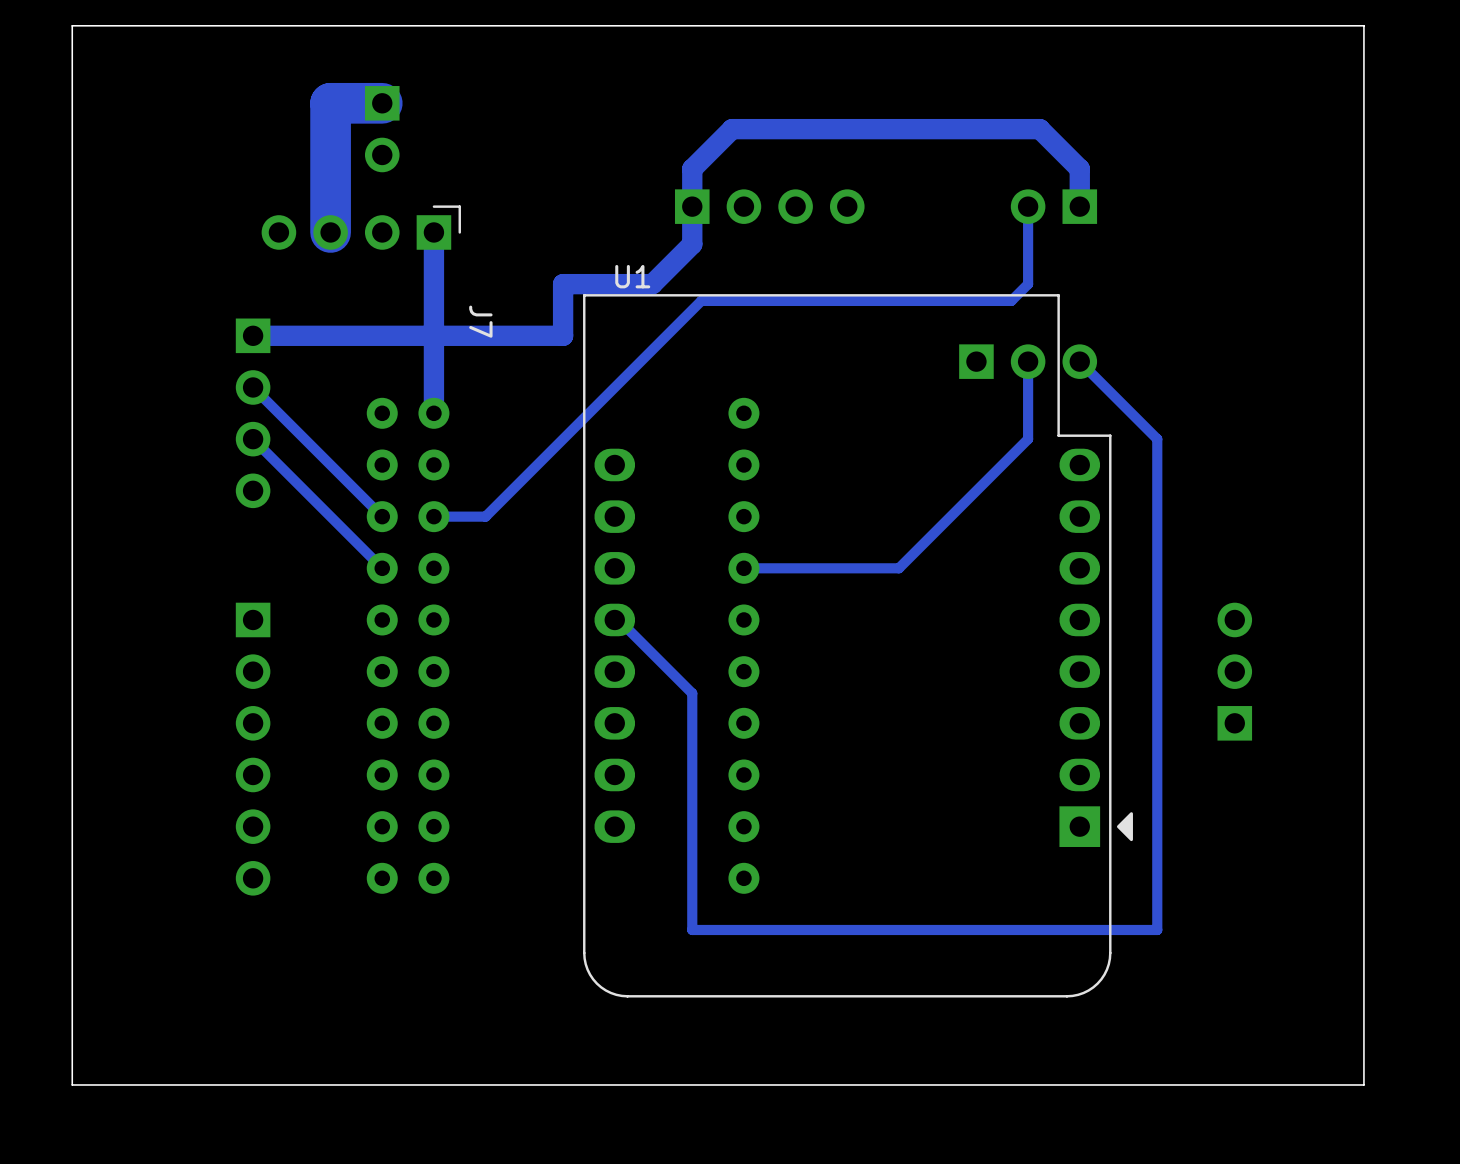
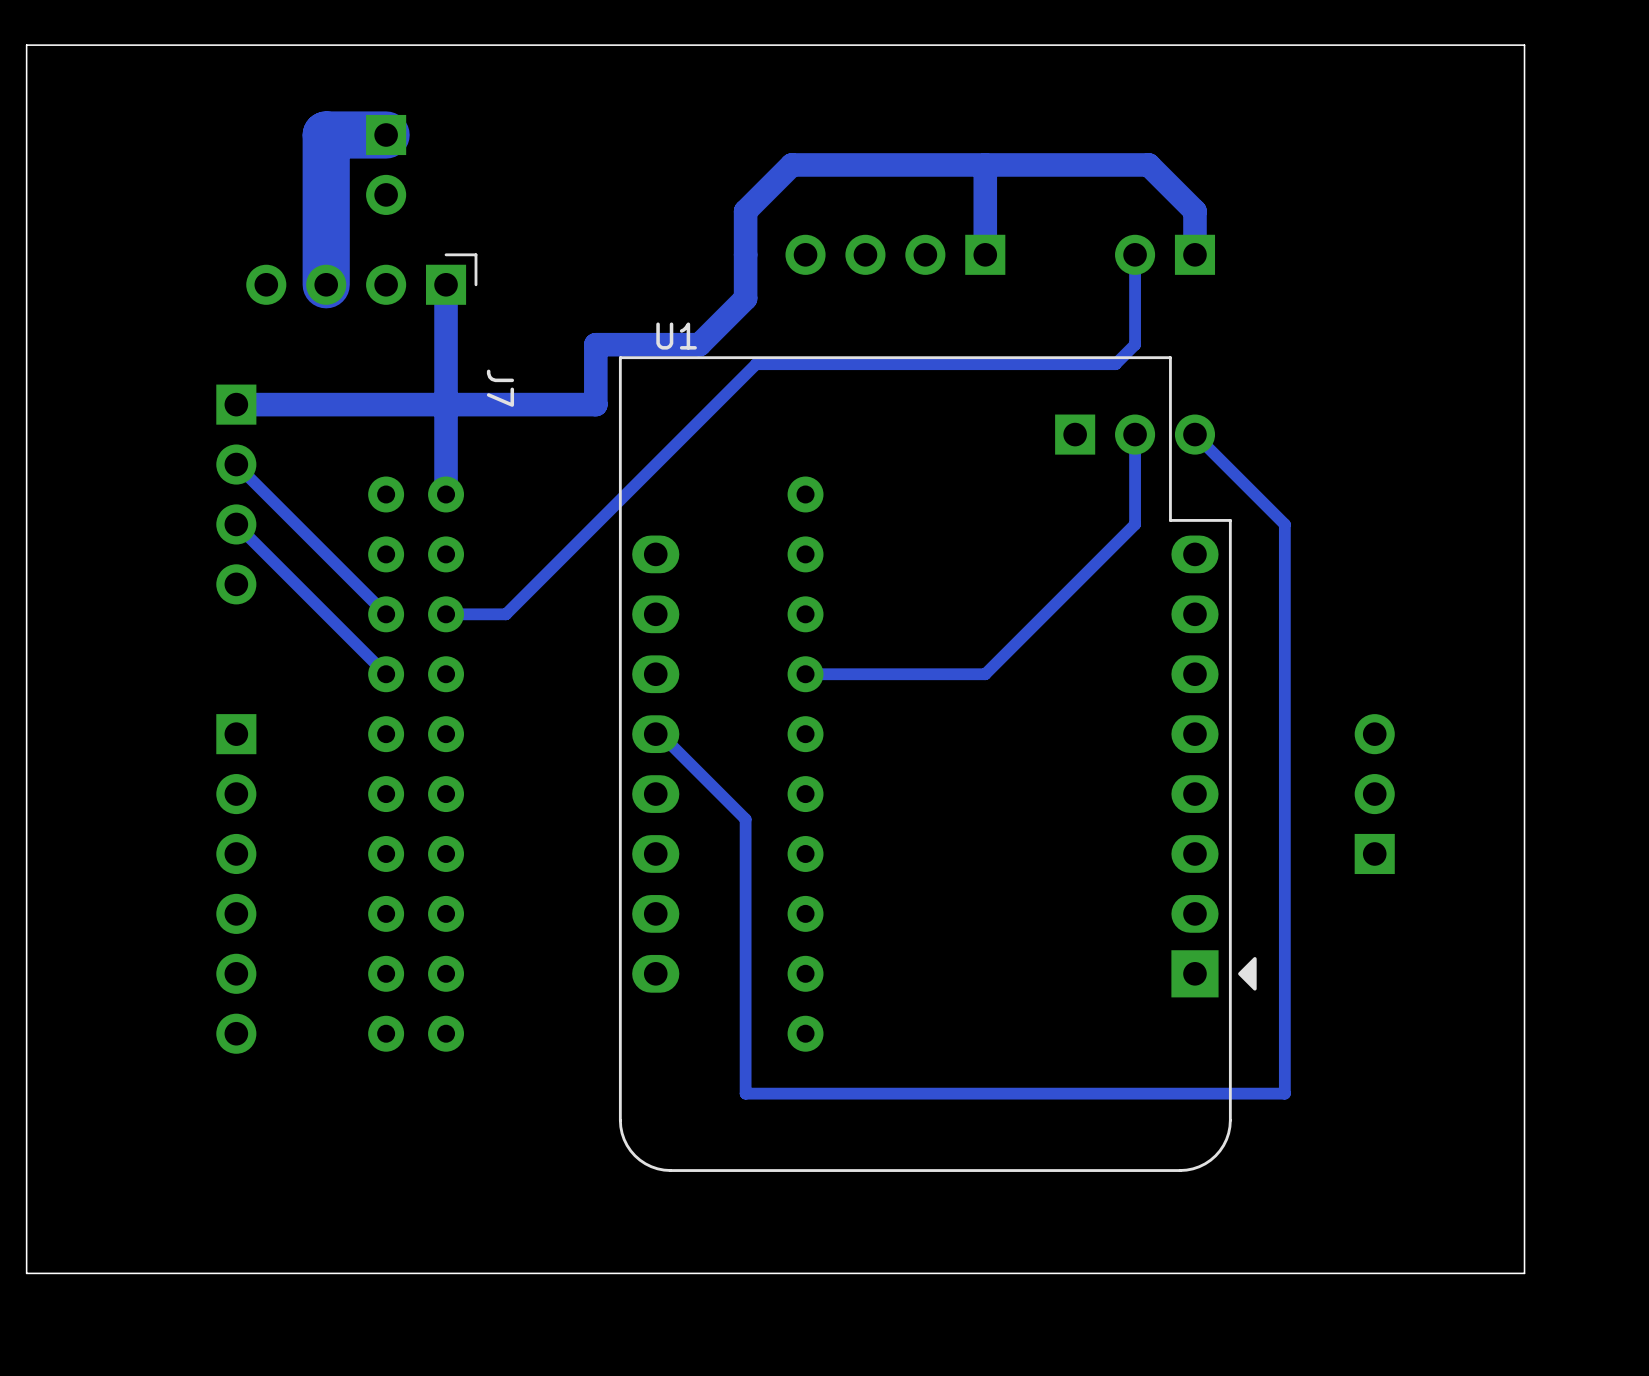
track: none -> (985, 164) (985, 254)
part rotation: 0° (769, 206) -> 180° (895, 254)

